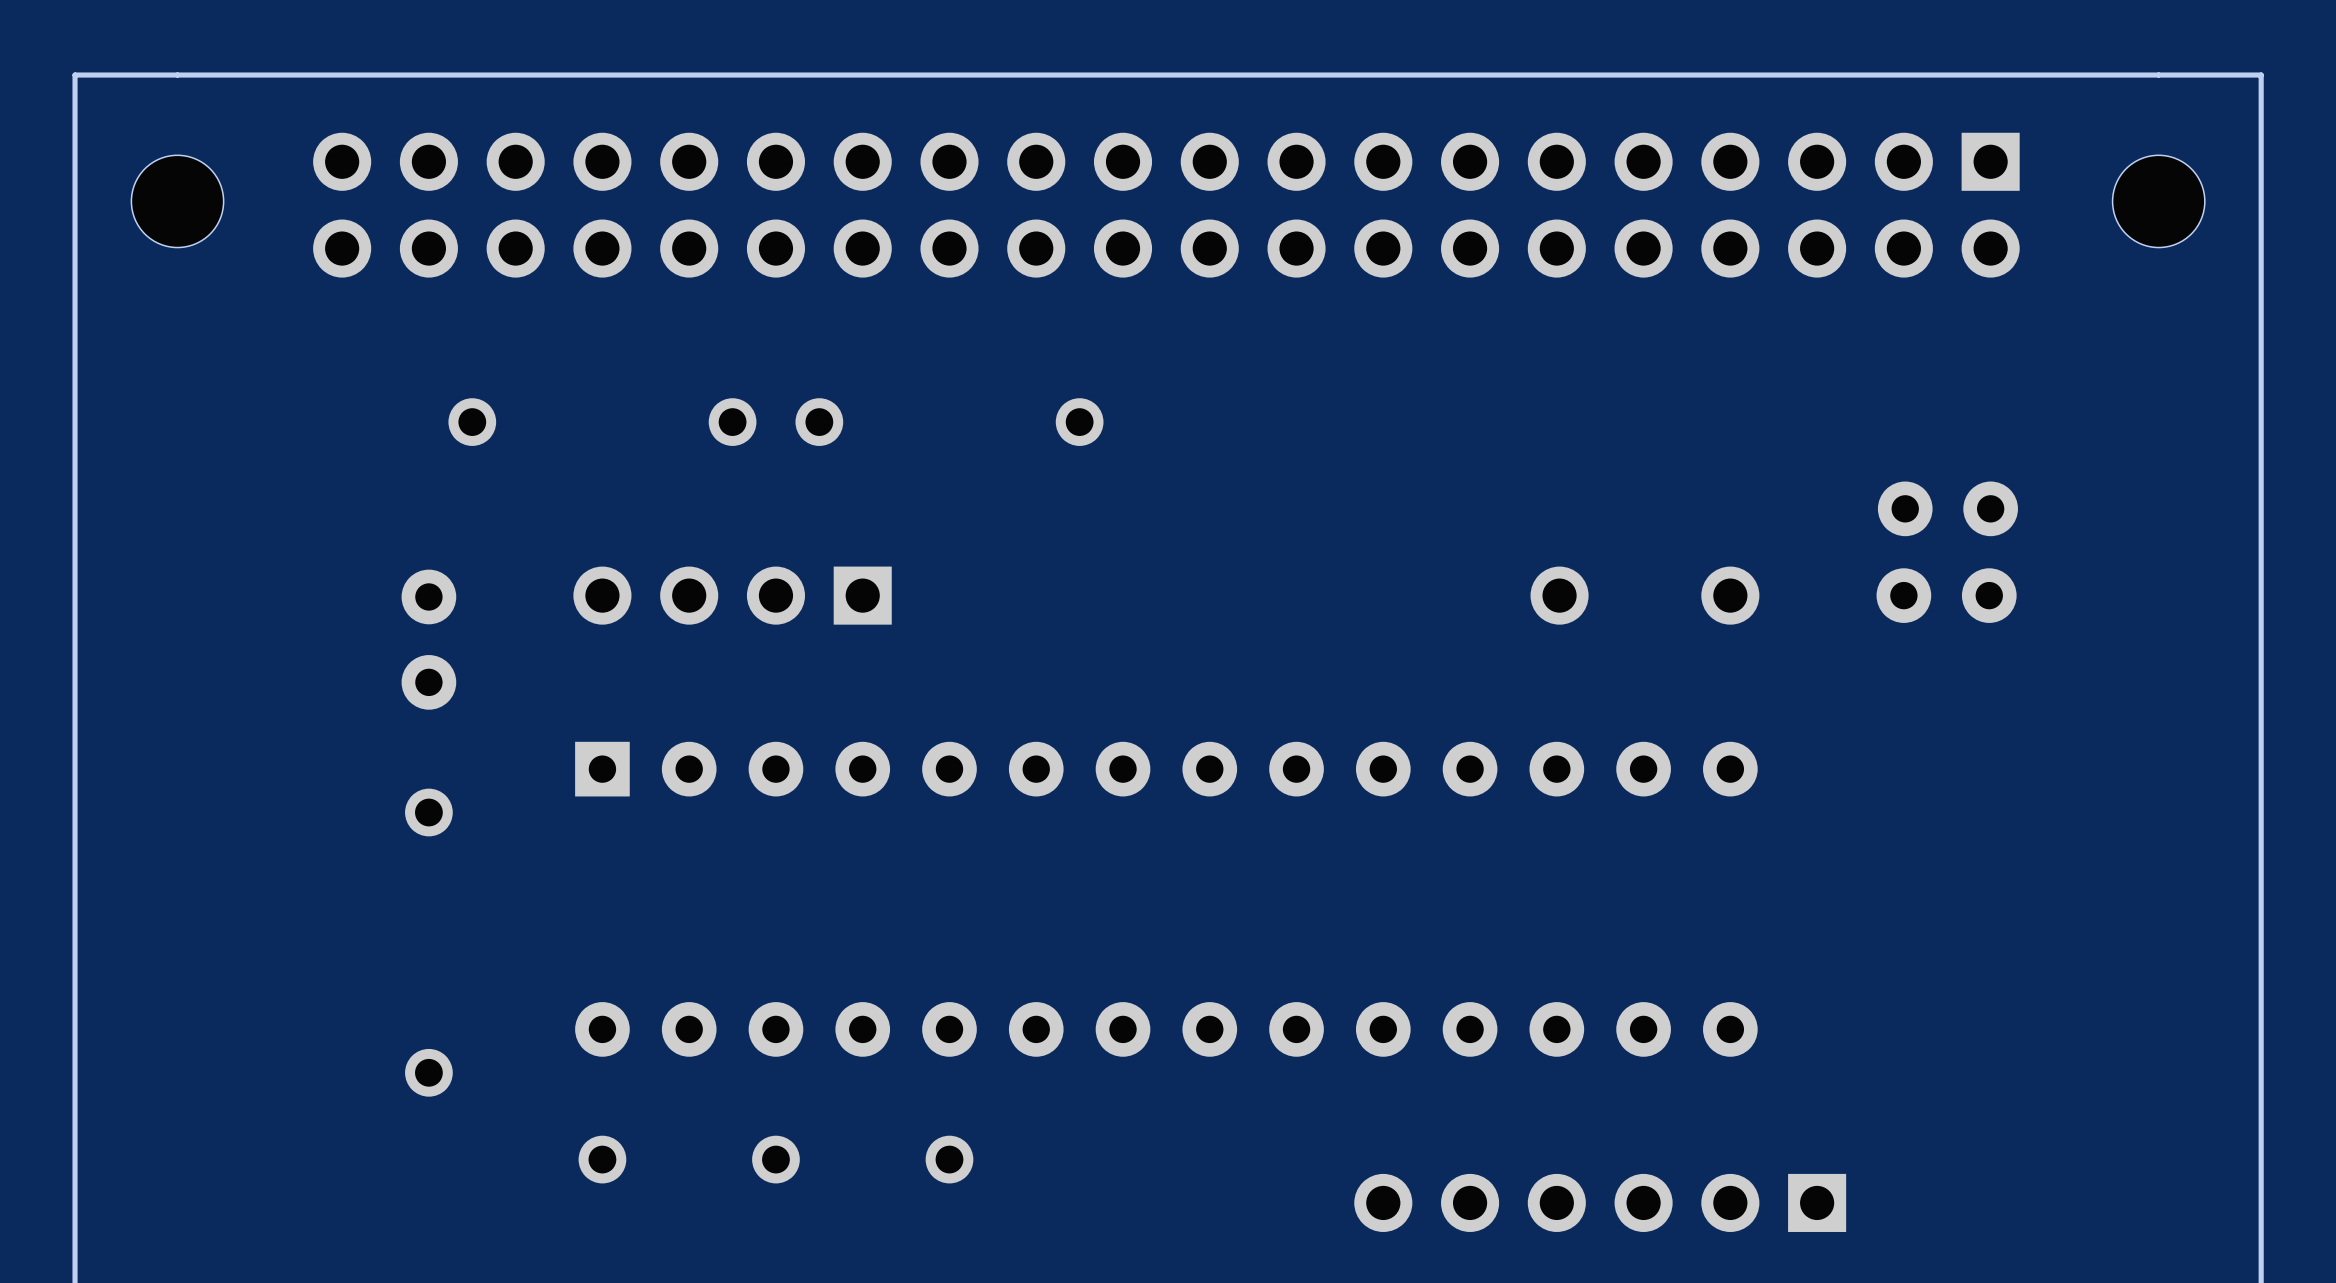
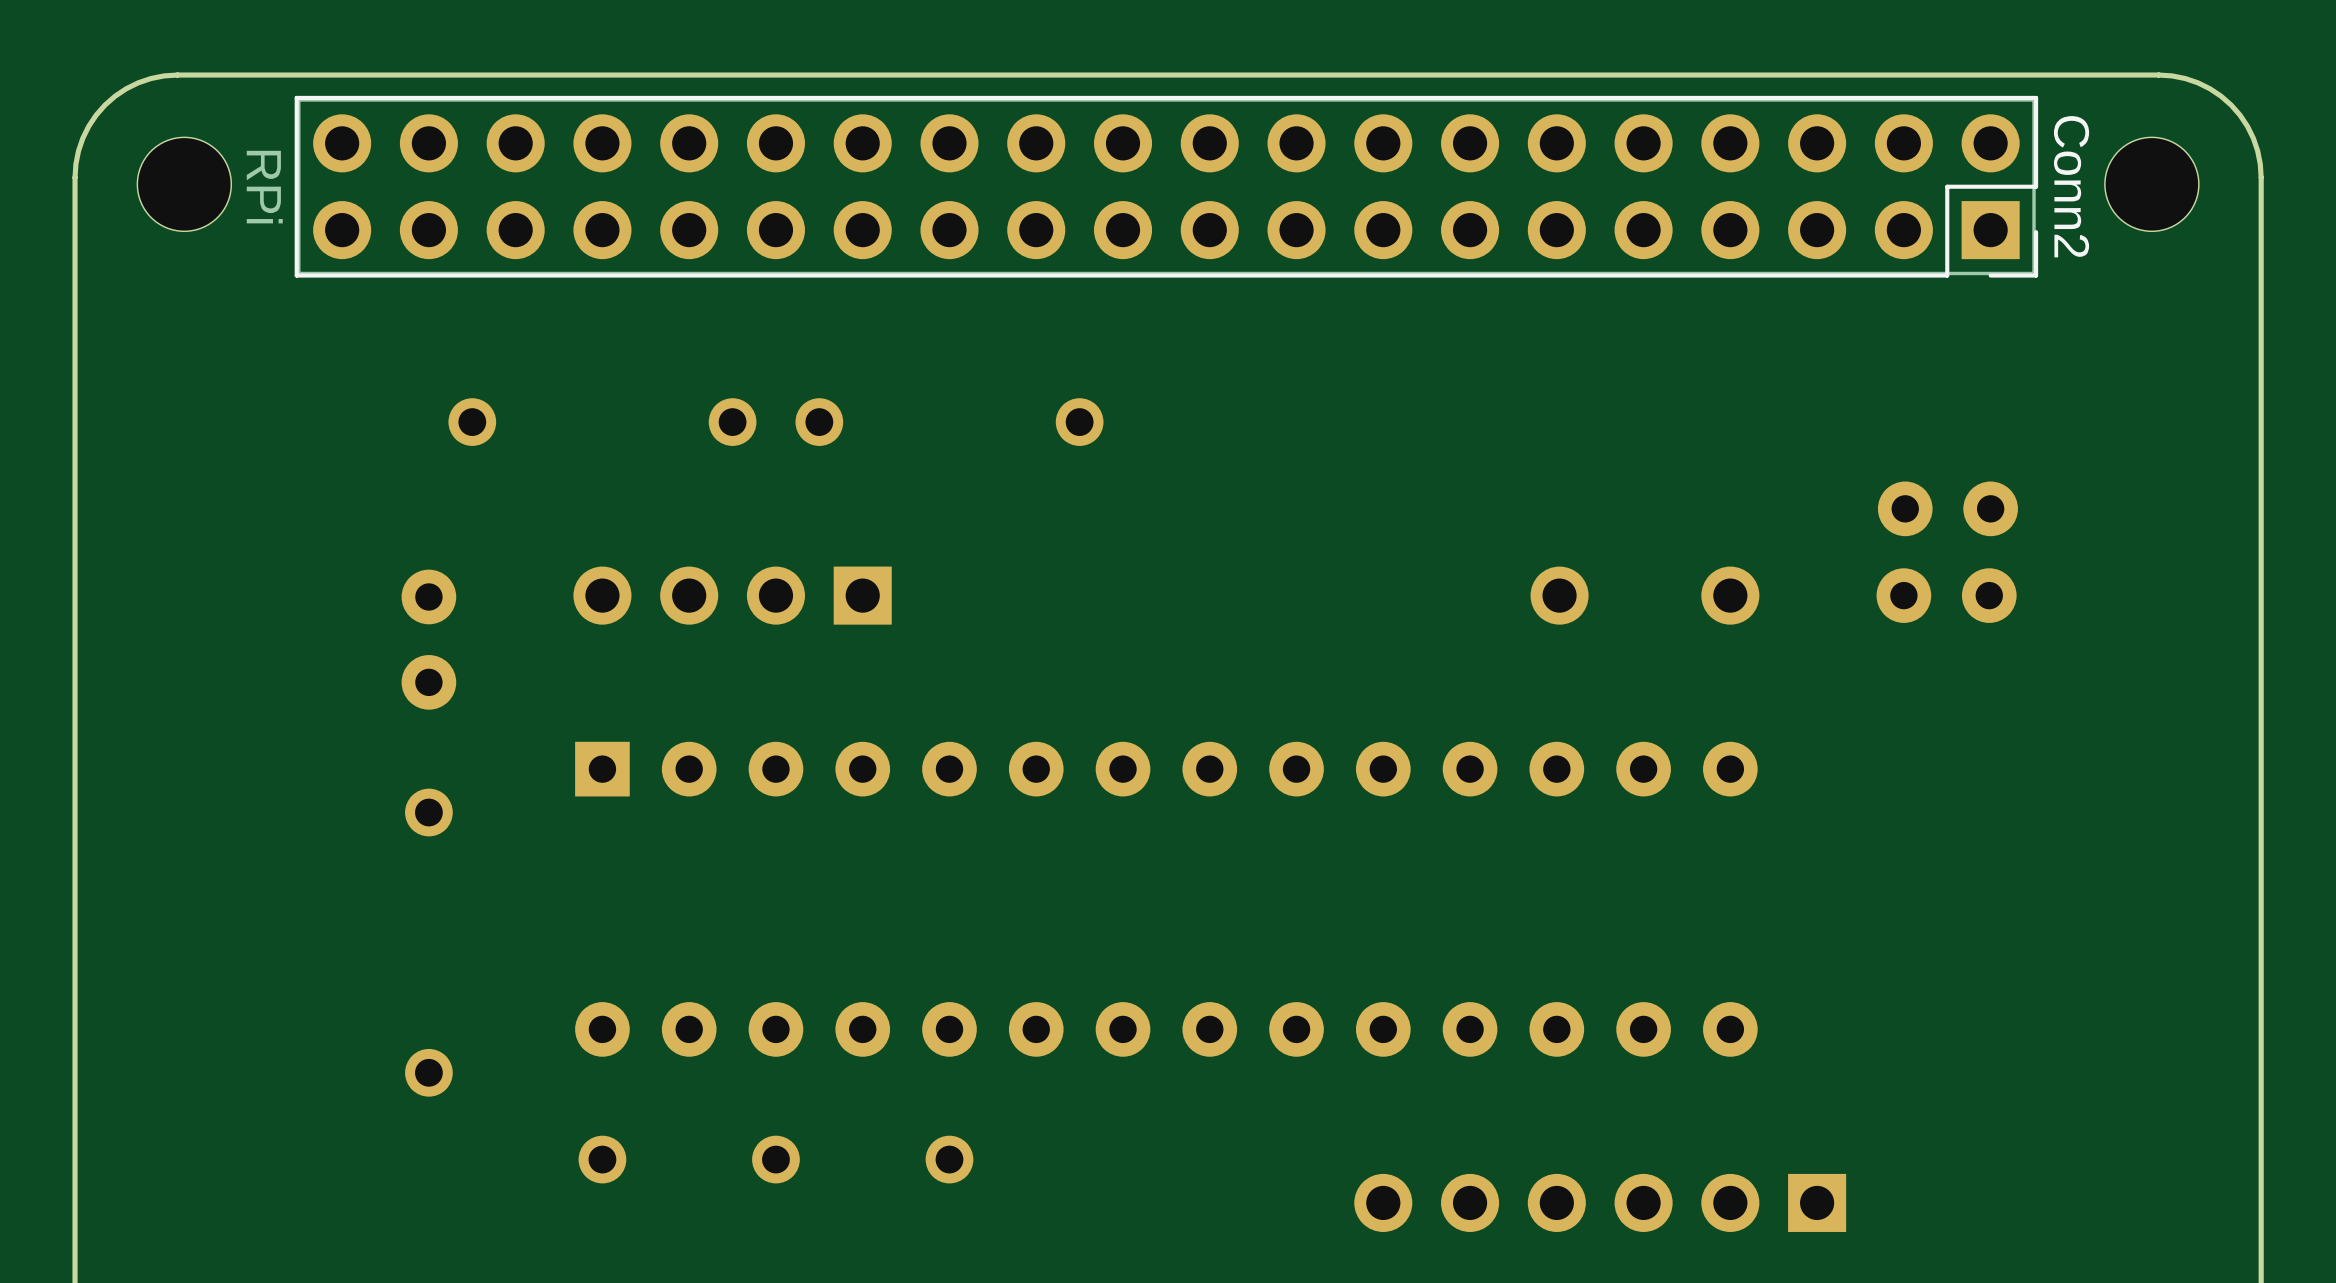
board edge: (177, 75) (75, 75) (75, 177) -> (177, 75) (150, 78) (138, 82) (126, 88) (105, 105) (96, 115) (82, 138) (75, 164) (75, 177)
board edge: (2158, 75) (2261, 75) (2261, 177) -> (2158, 75) (2185, 78) (2197, 82) (2209, 88) (2231, 105) (2247, 126) (2253, 138) (2260, 164) (2261, 177)
part footprint: [131, 155, 224, 248] -> [137, 137, 232, 232]
part footprint: [2112, 155, 2205, 248] -> [2104, 137, 2199, 232]
Conn2 side: top (1166, 205) -> bottom (1166, 186)

